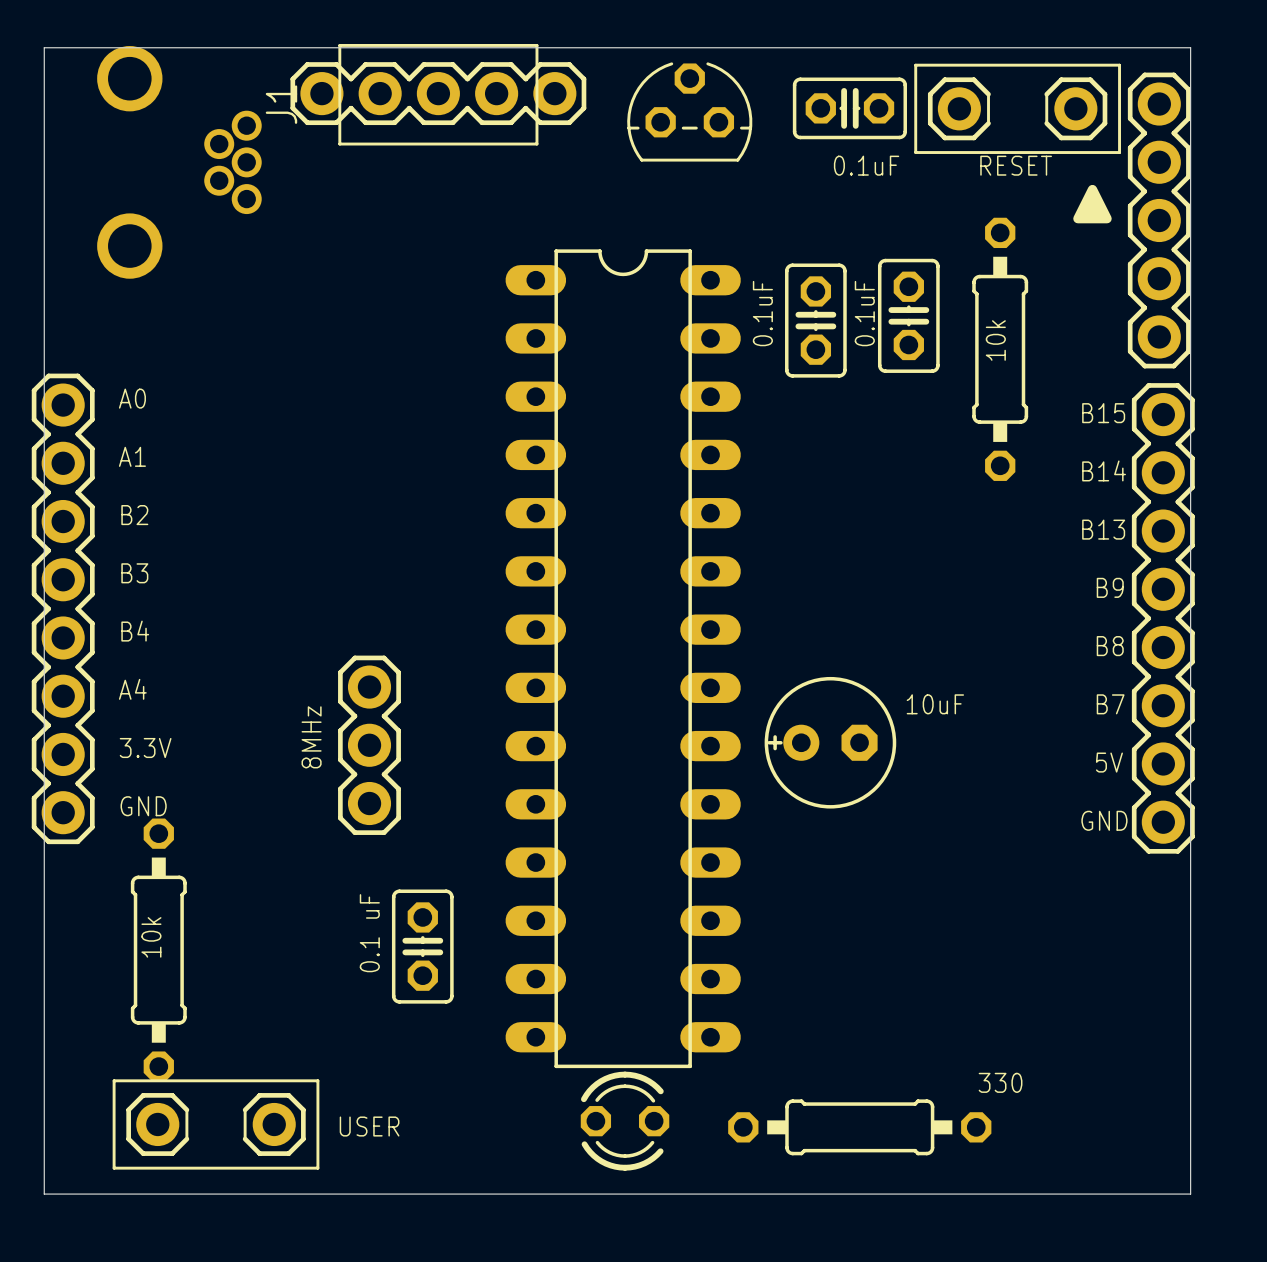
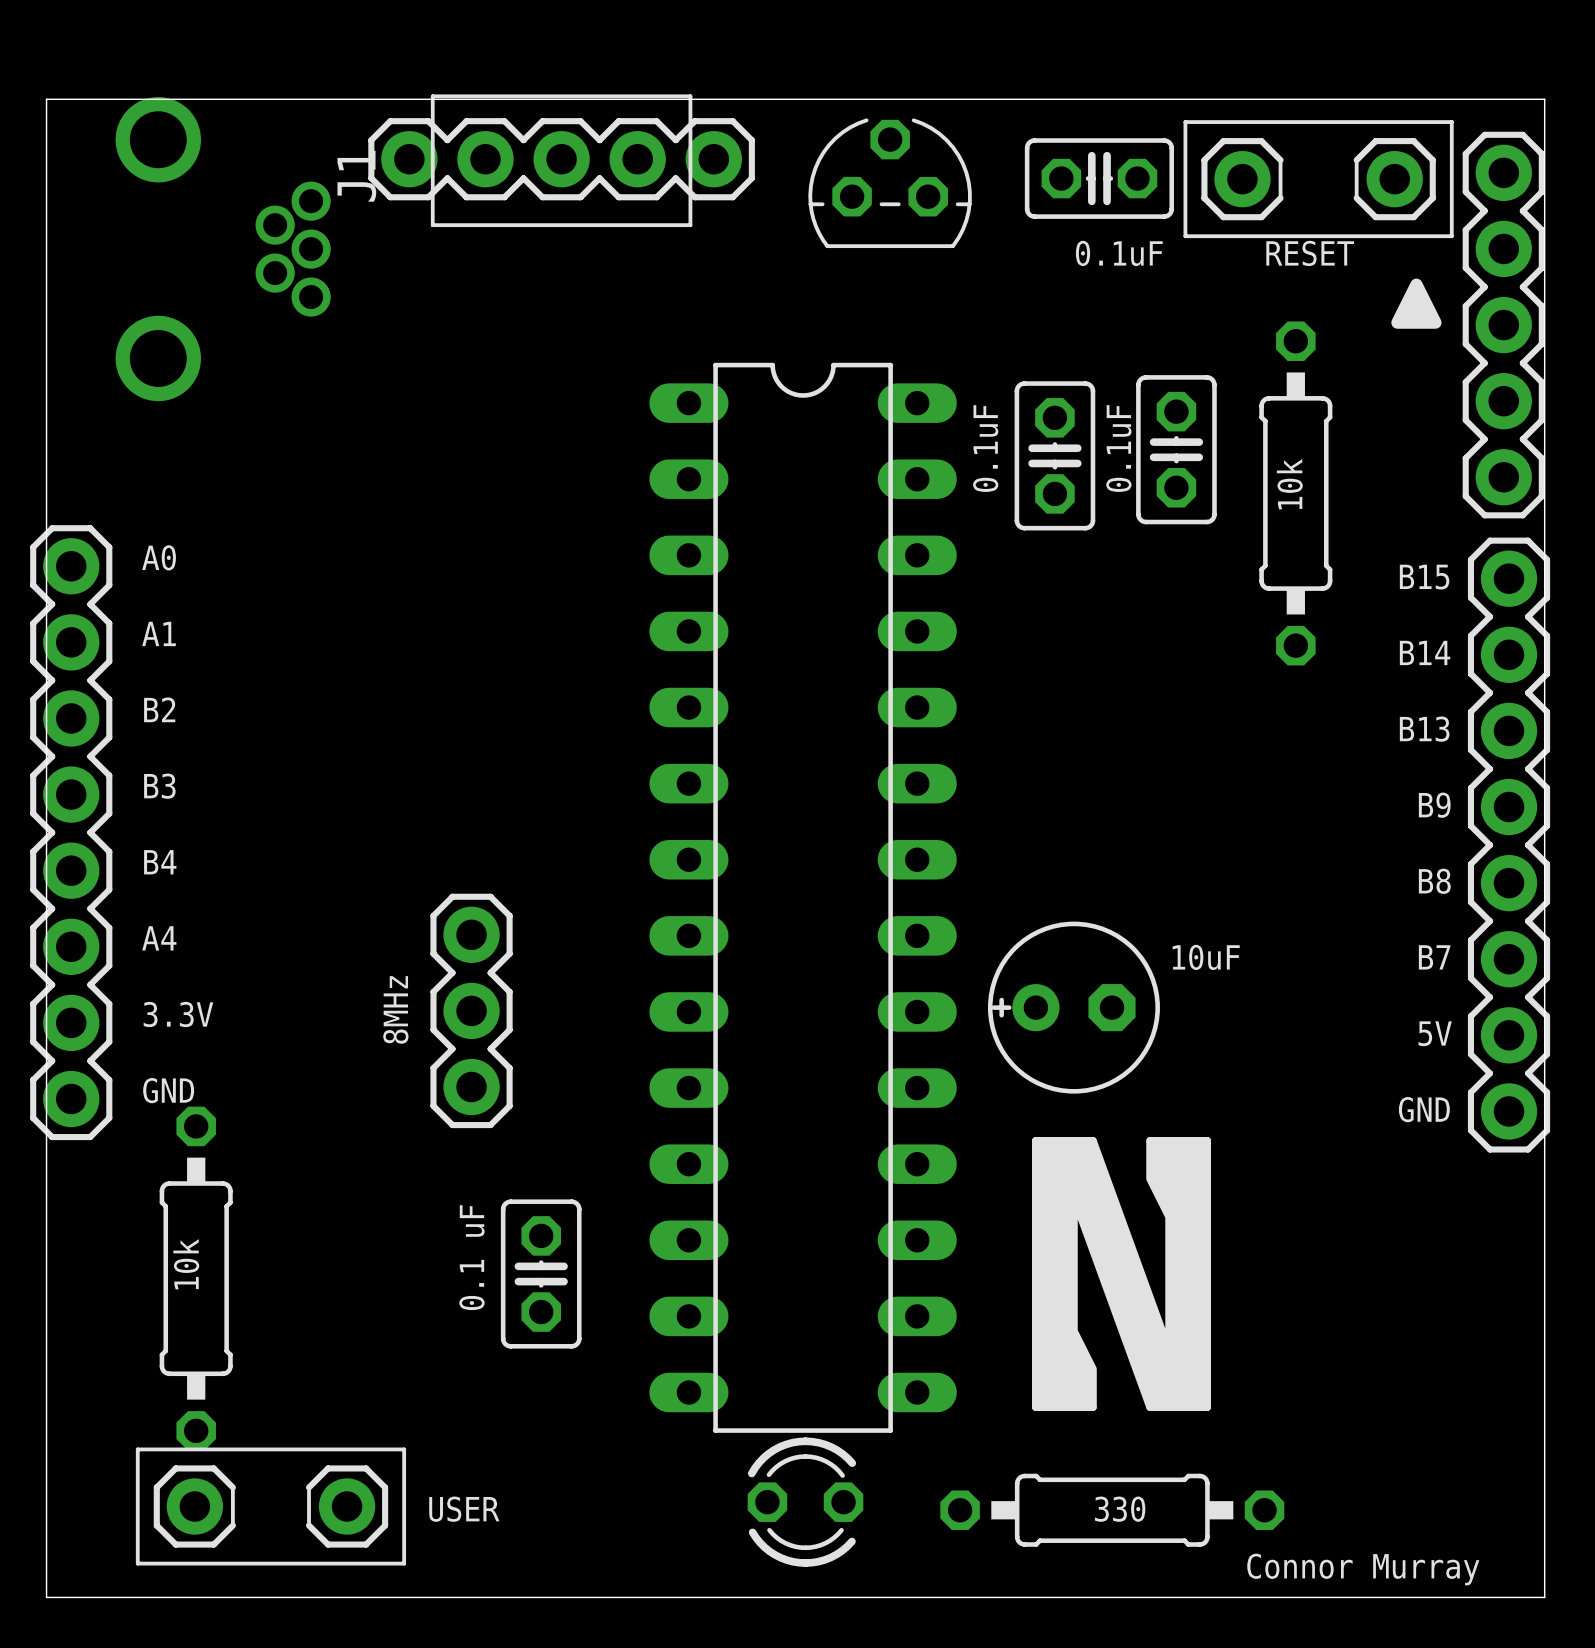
drawing: none -> [1032, 1137, 1211, 1411]
text position: 330 (1000, 1082) -> 330 (1120, 1509)
text: none -> Connor Murray (1363, 1569)

